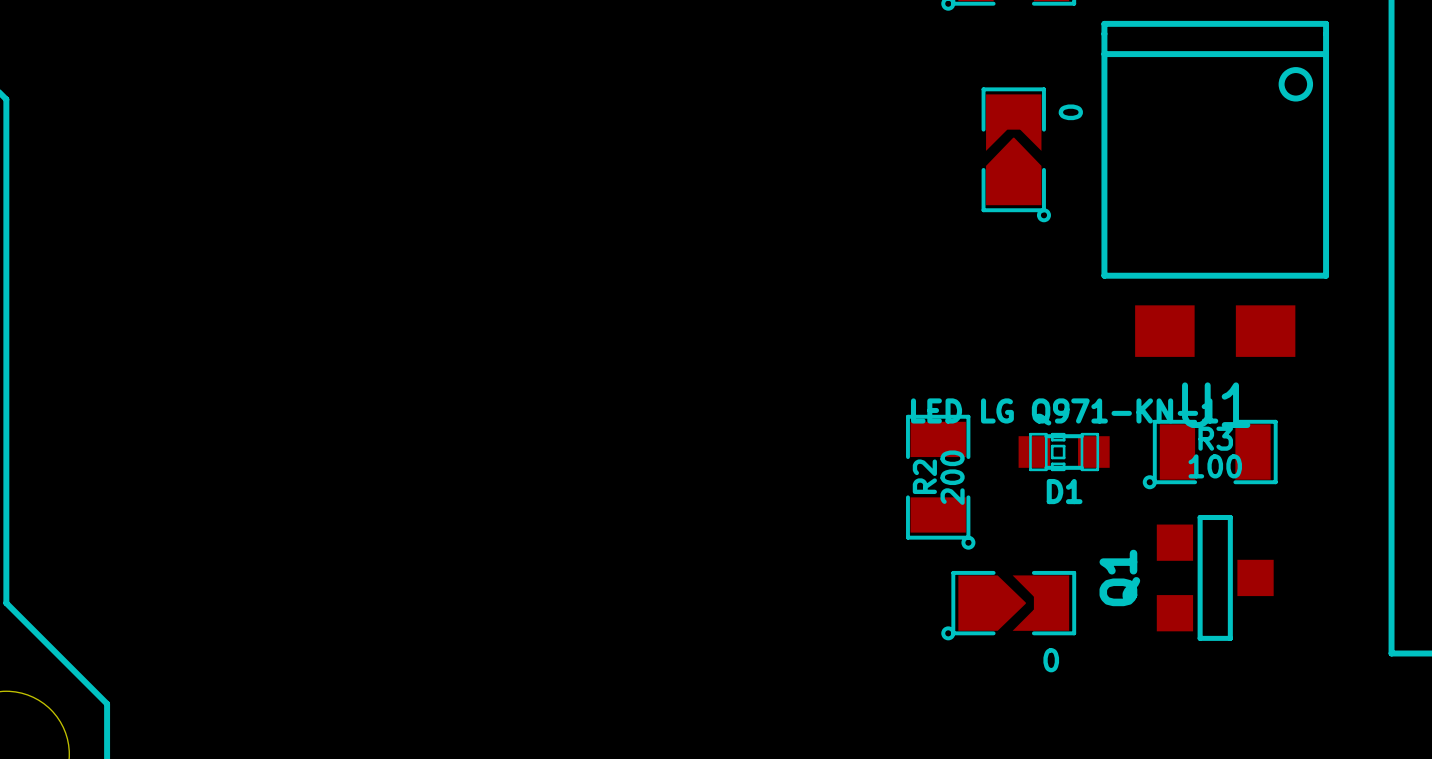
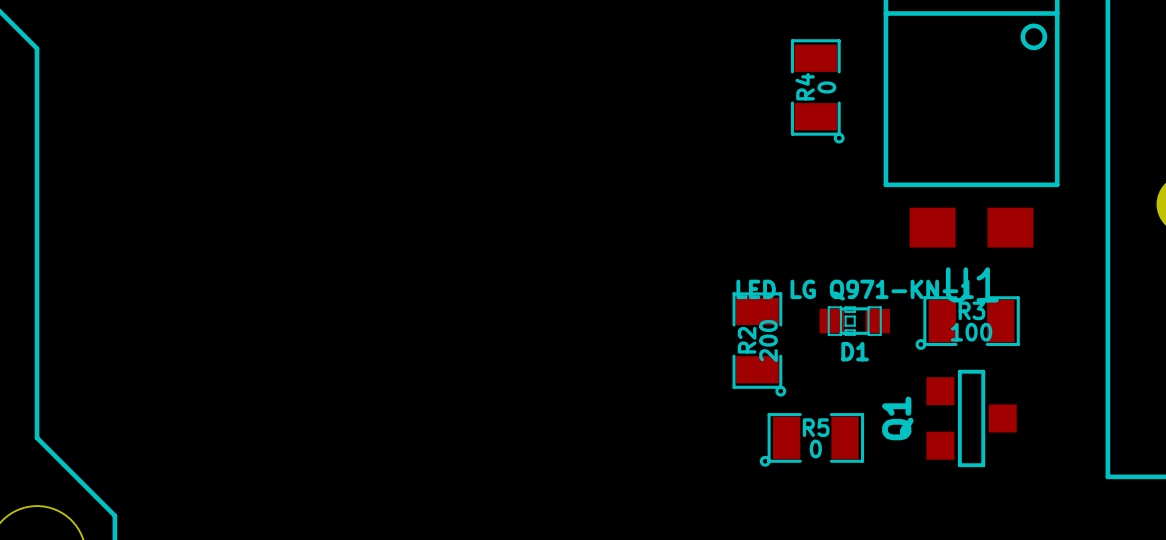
part: 0 (1016, 154) -> none
R4: none -> 0 (817, 91)
part: 0 (1008, 605) -> none
R5: none -> 0 (811, 439)

